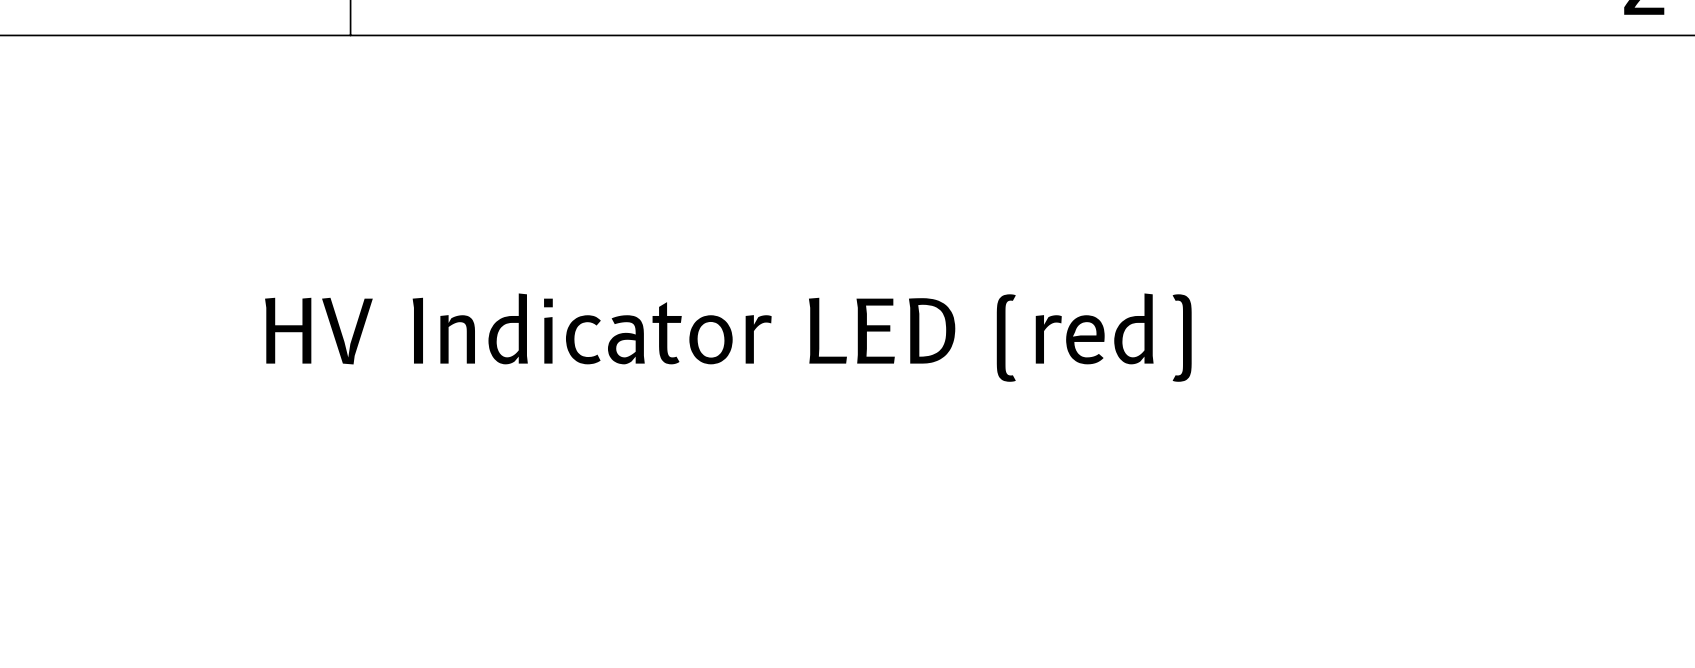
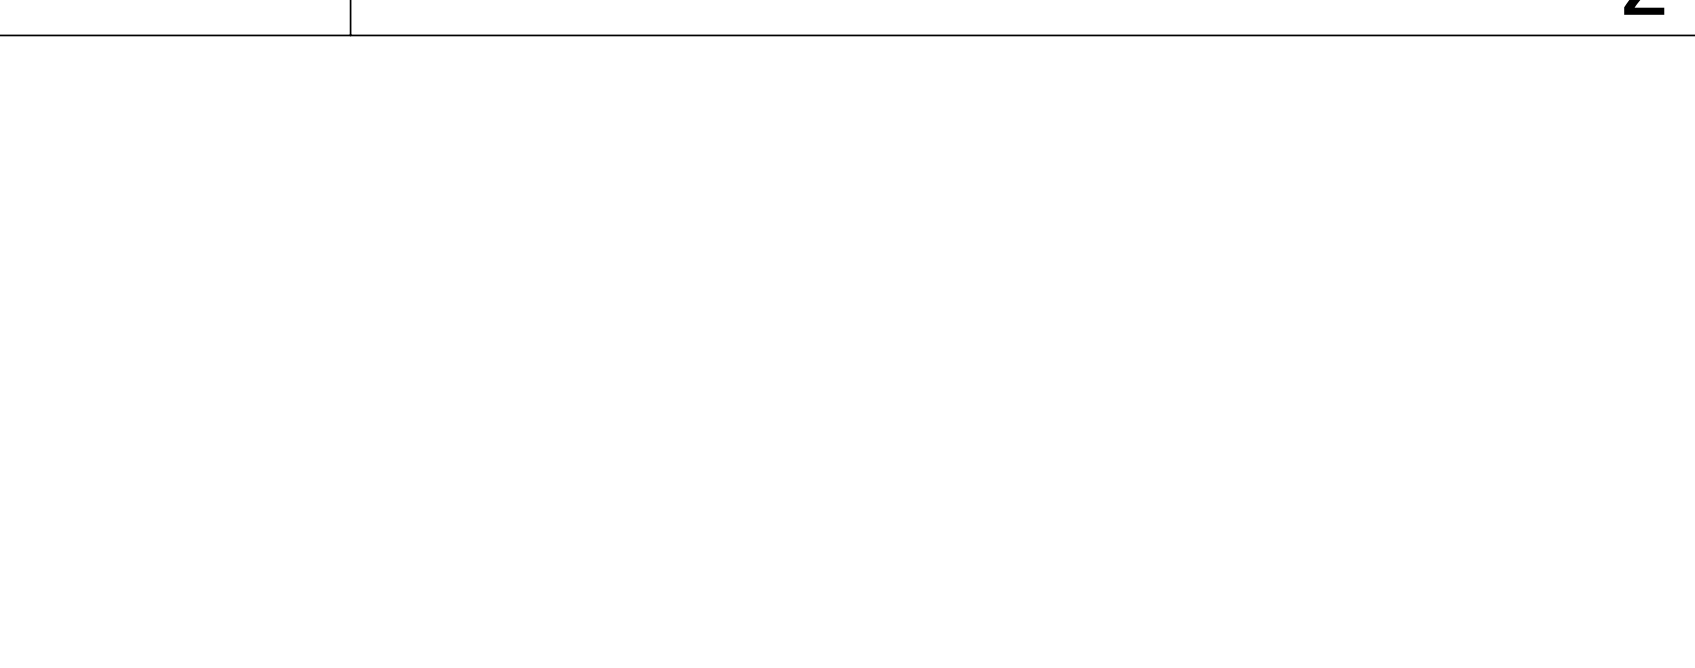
text: HV Indicator LED (red) (728, 337) -> none

